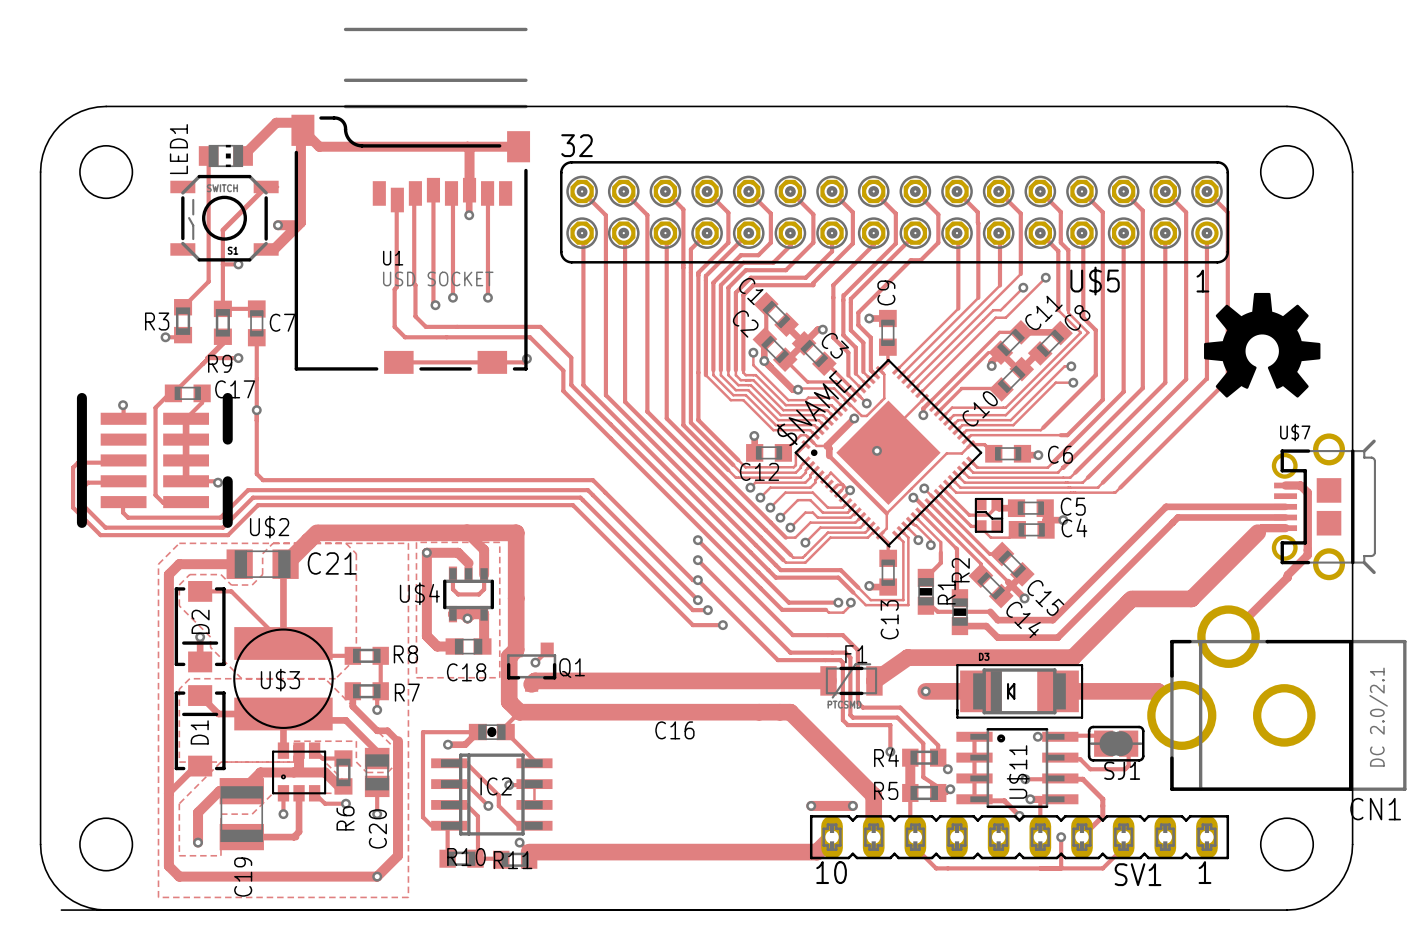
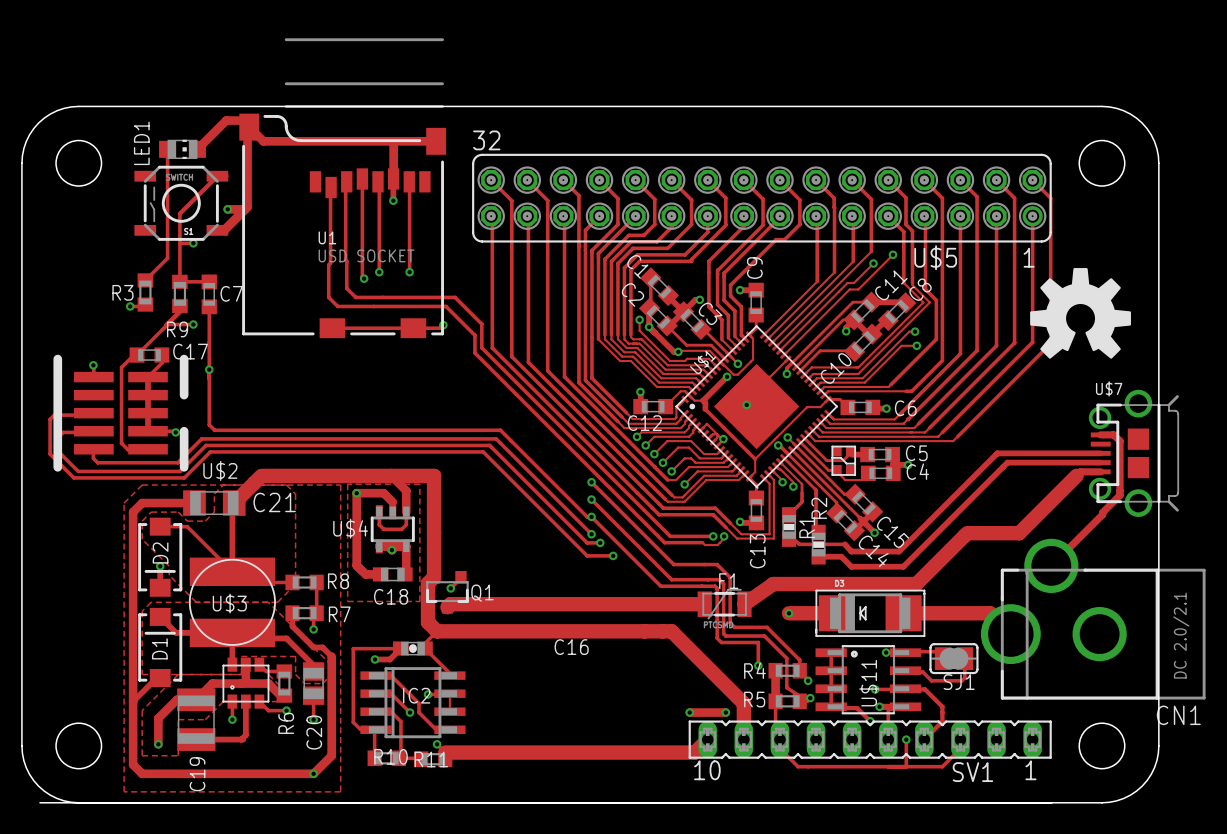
part: (888, 453) -> none
U$1: none -> (756, 407)

